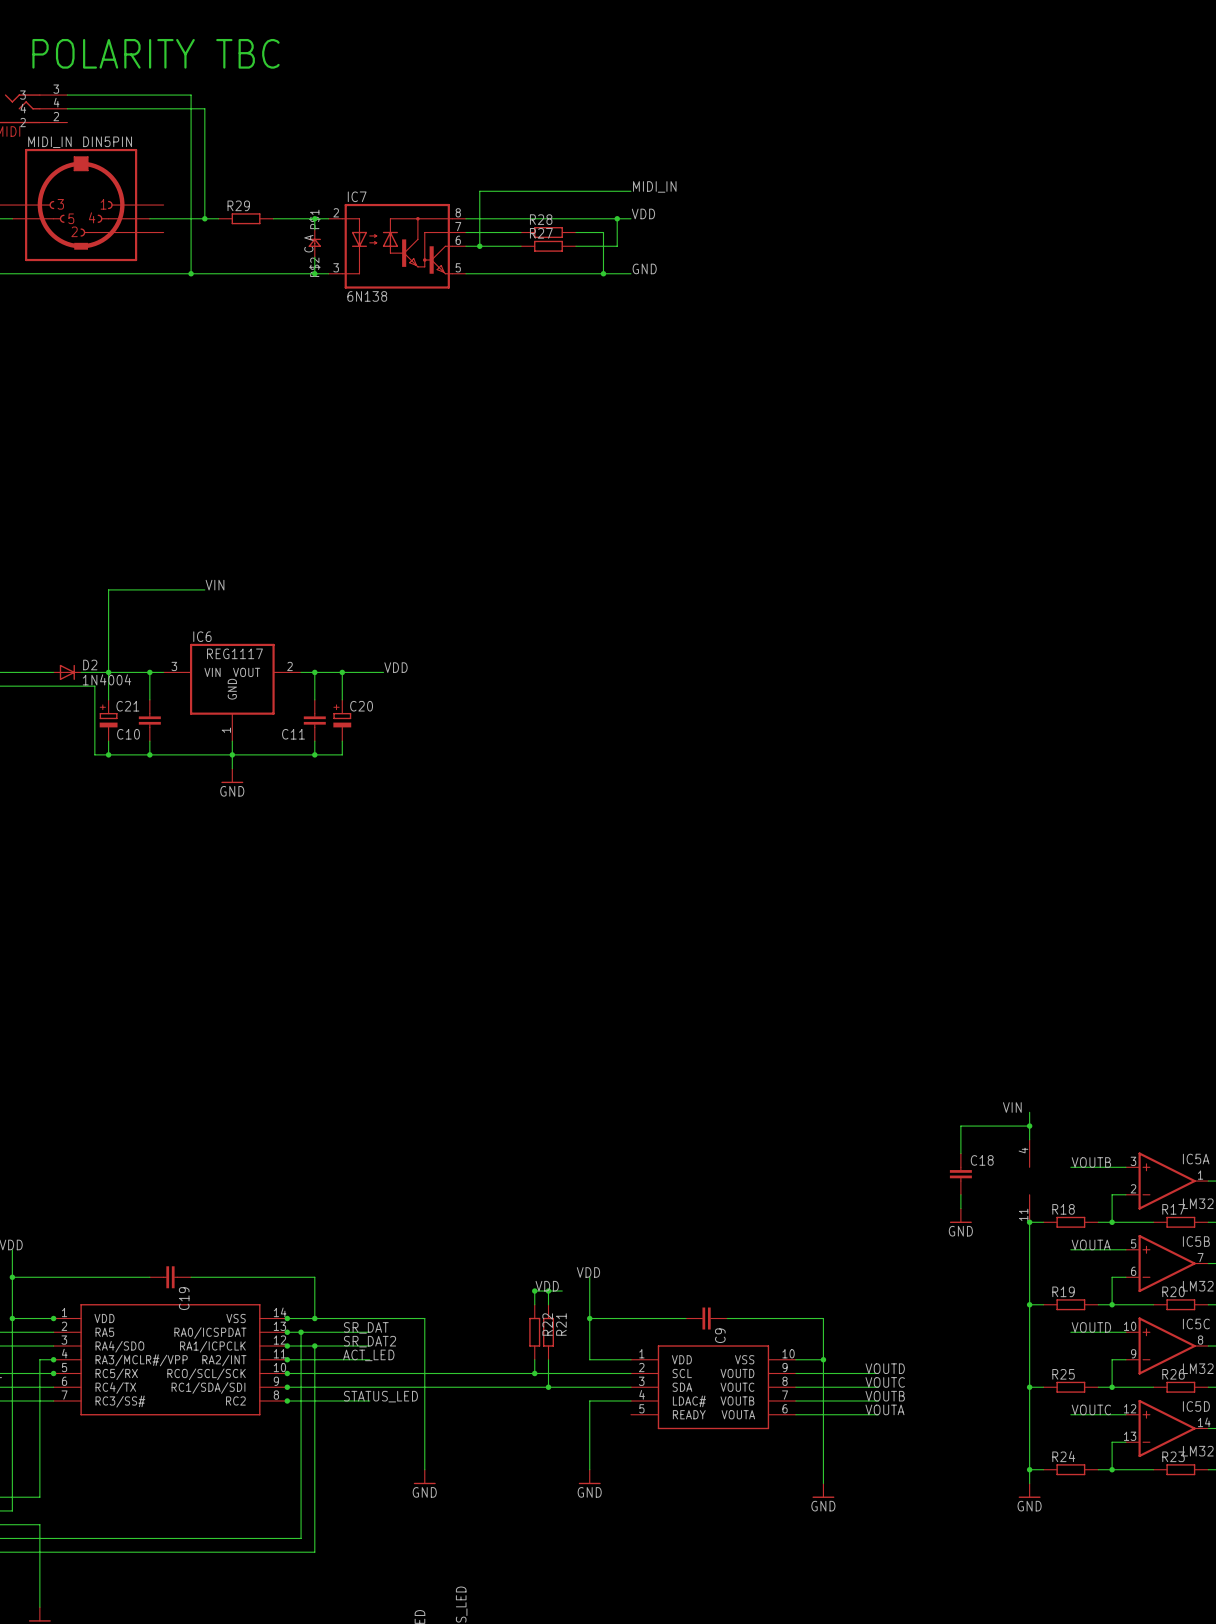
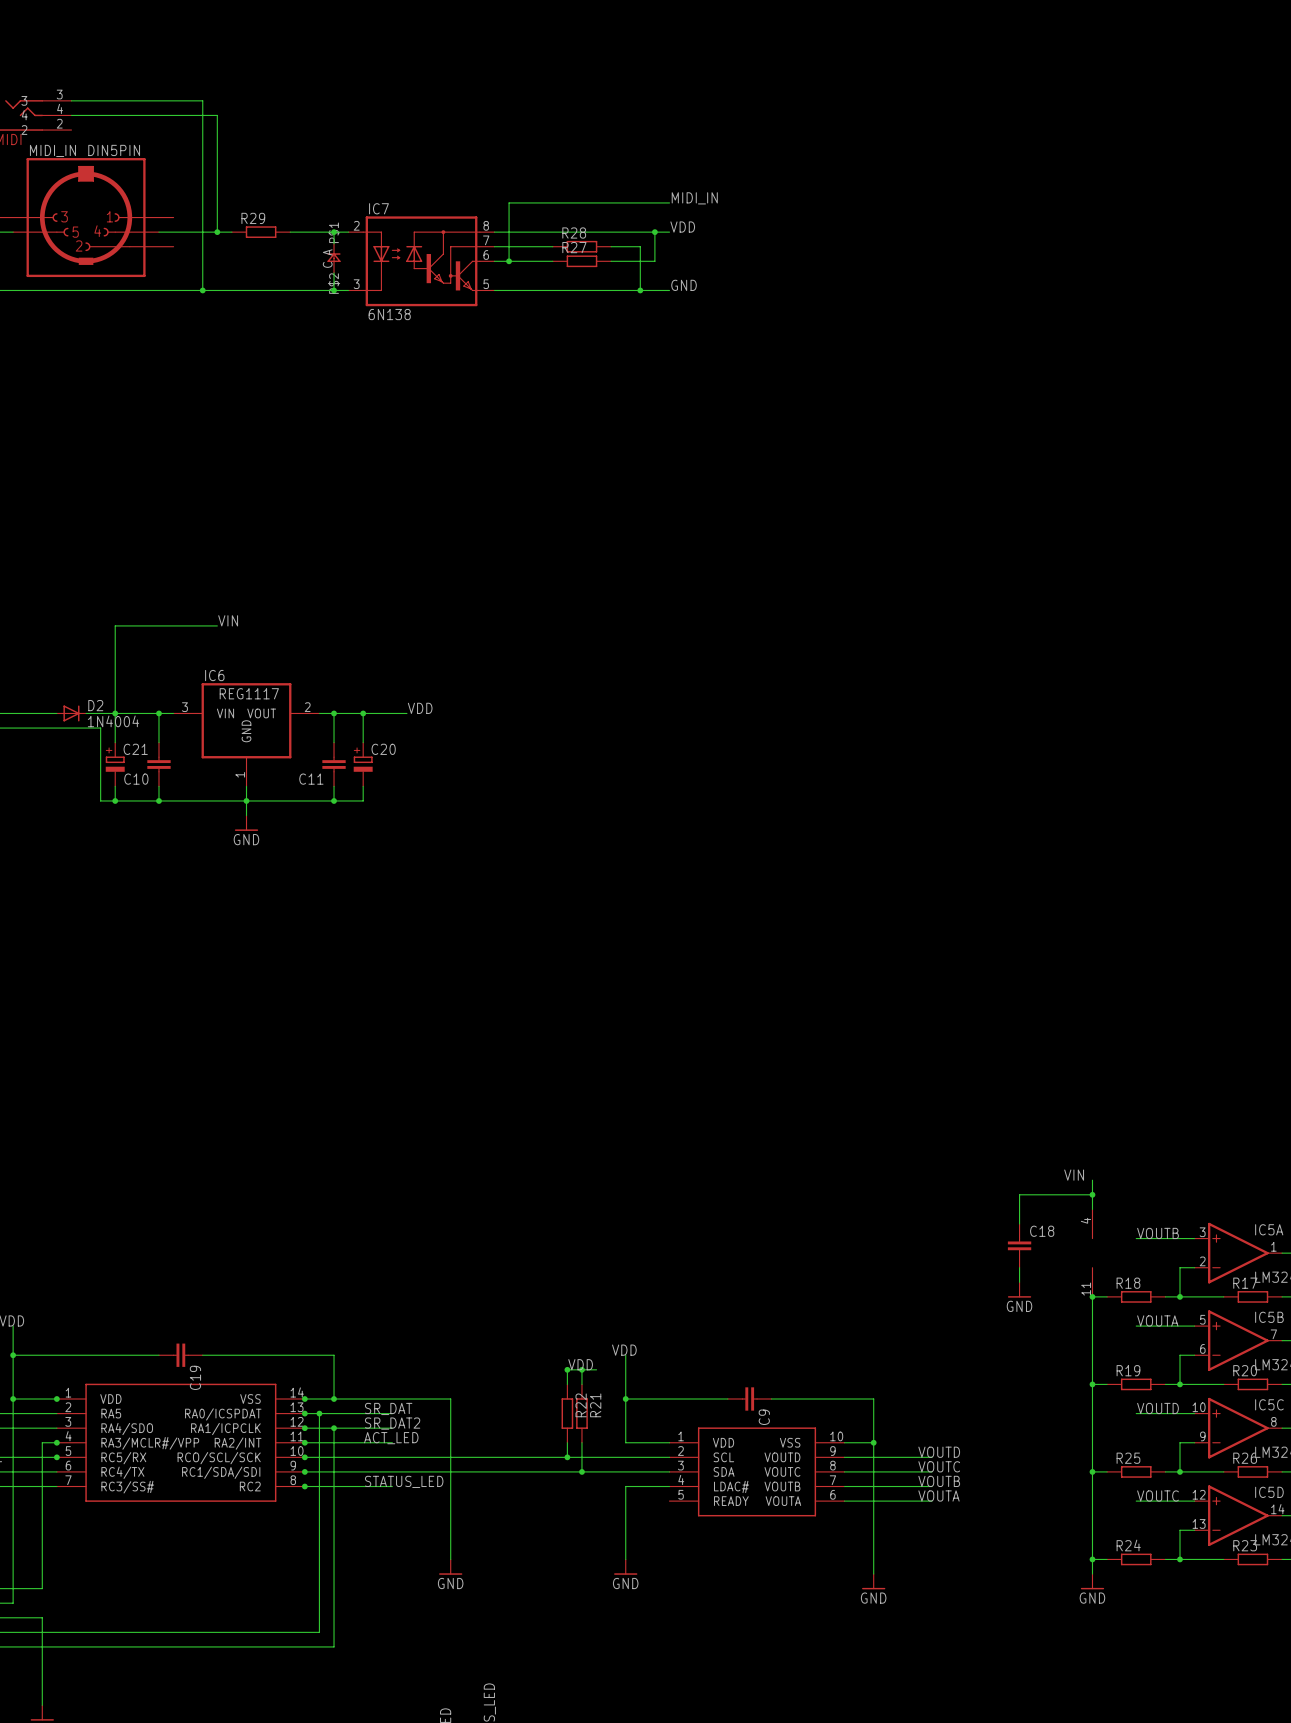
text: POLARITY TBC (156, 53) -> none

